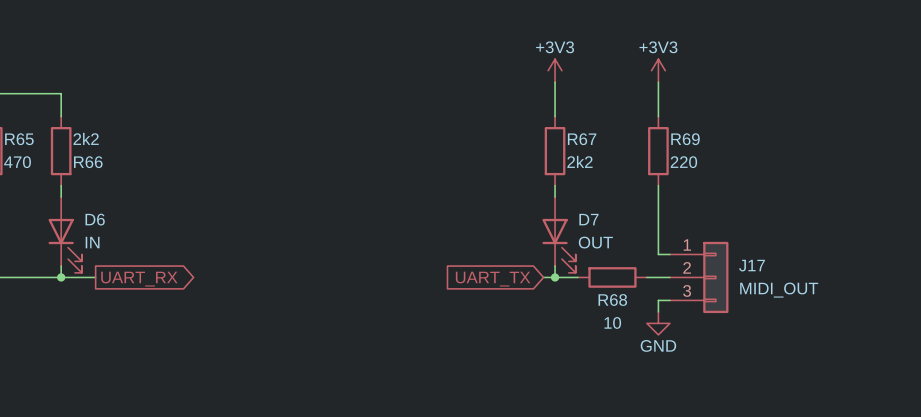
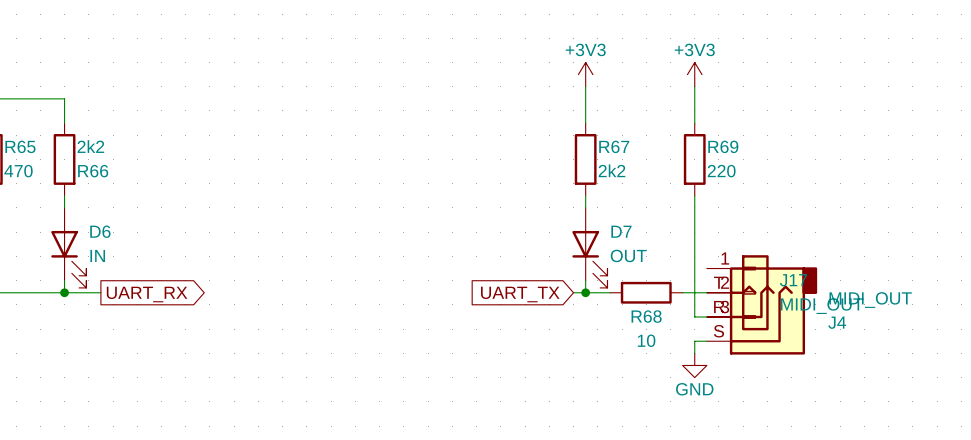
wire: (658, 254) (669, 254) -> (694, 268) (694, 317)
J4: none -> MIDI_OUT (762, 310)
wire: (658, 300) (658, 311) -> none
power symbol position: GND (658, 323) -> GND (694, 365)

